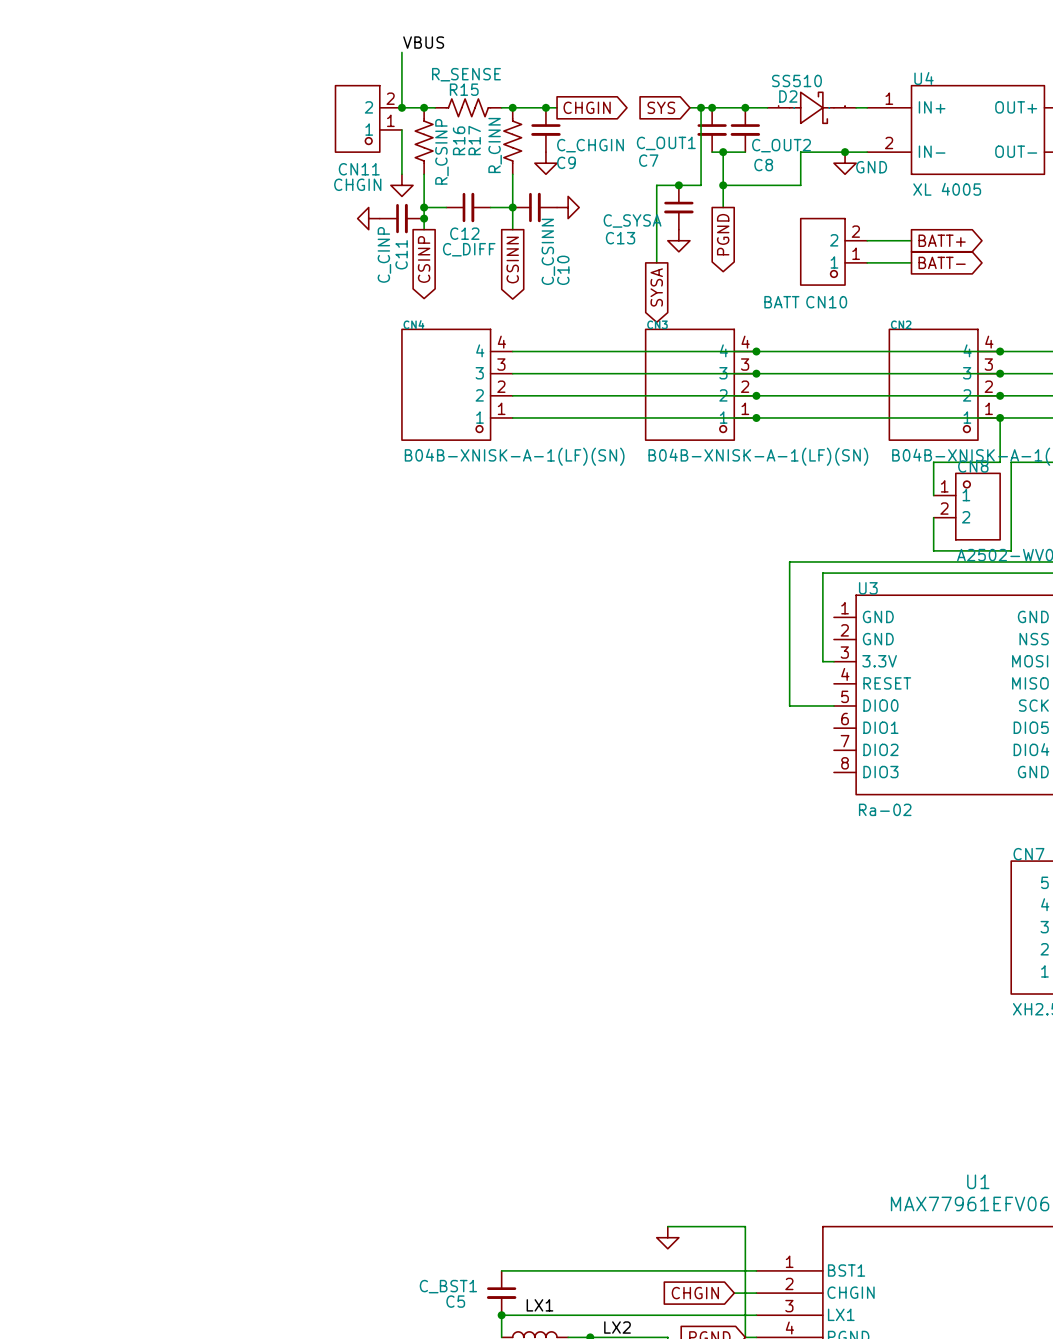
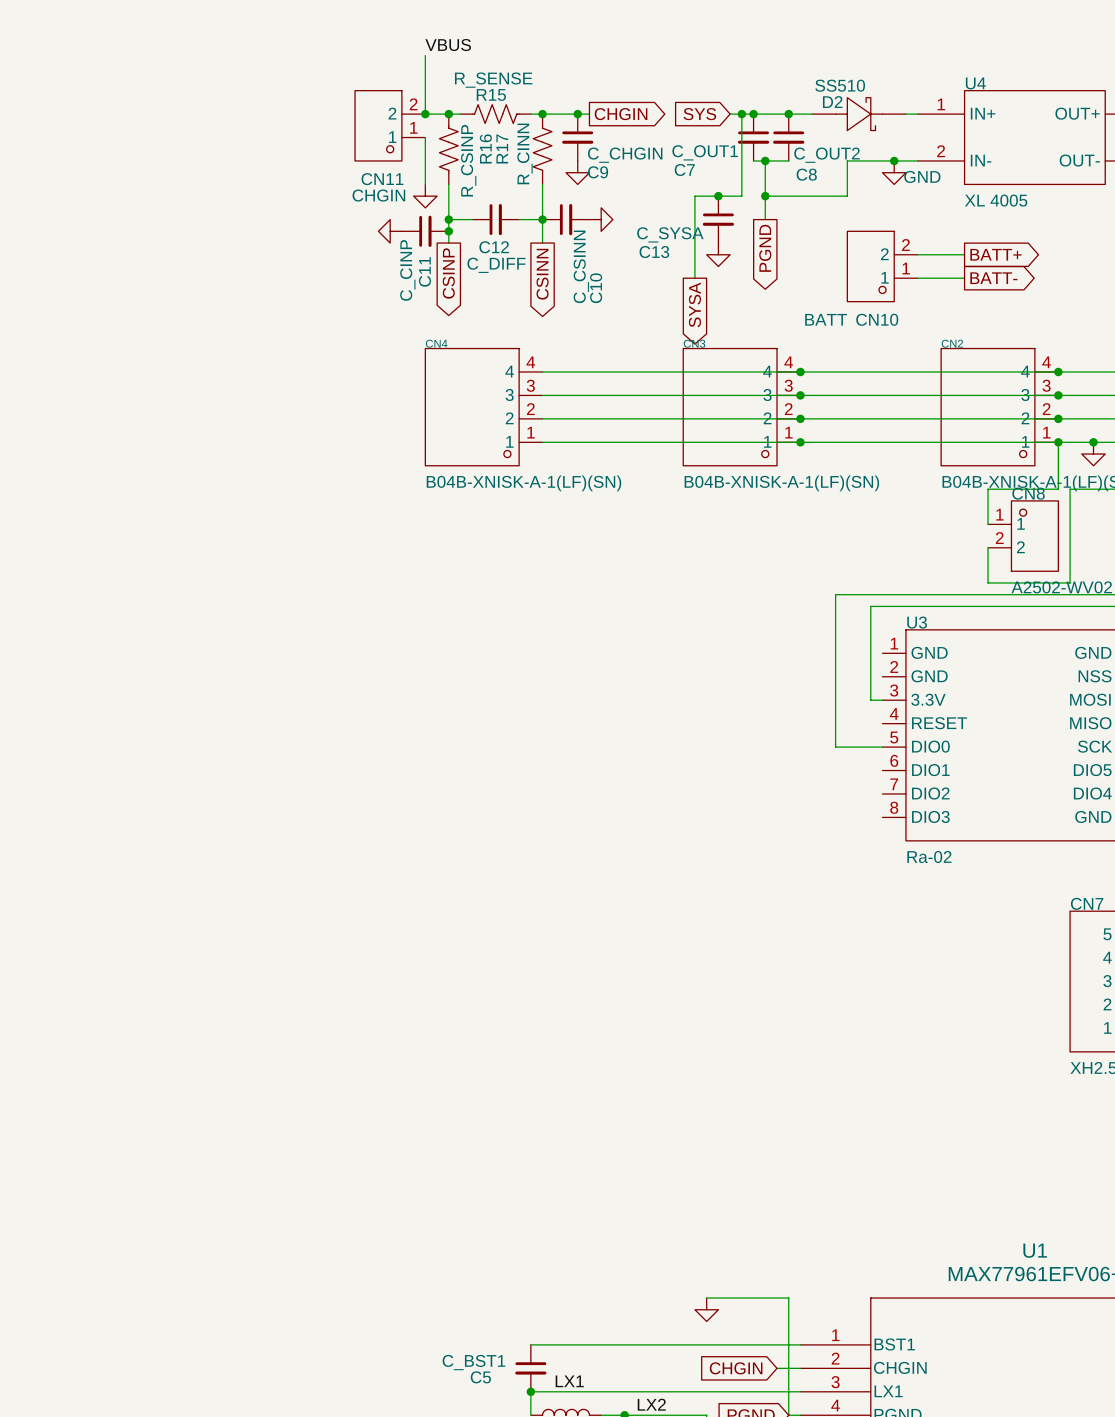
junction: none -> (1093, 442)
power symbol: none -> (1093, 454)

